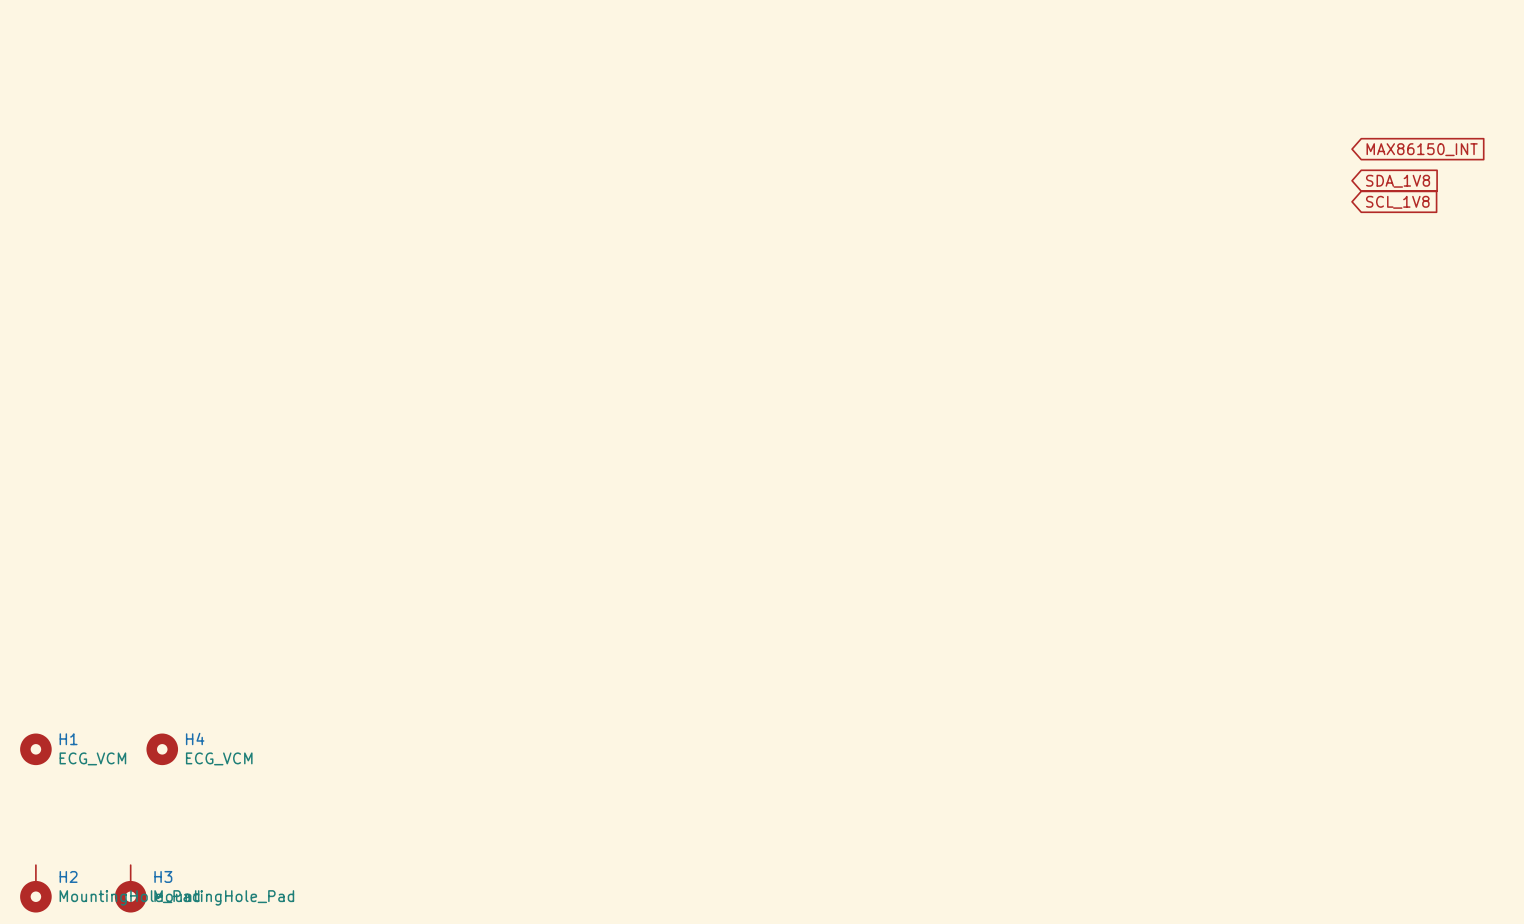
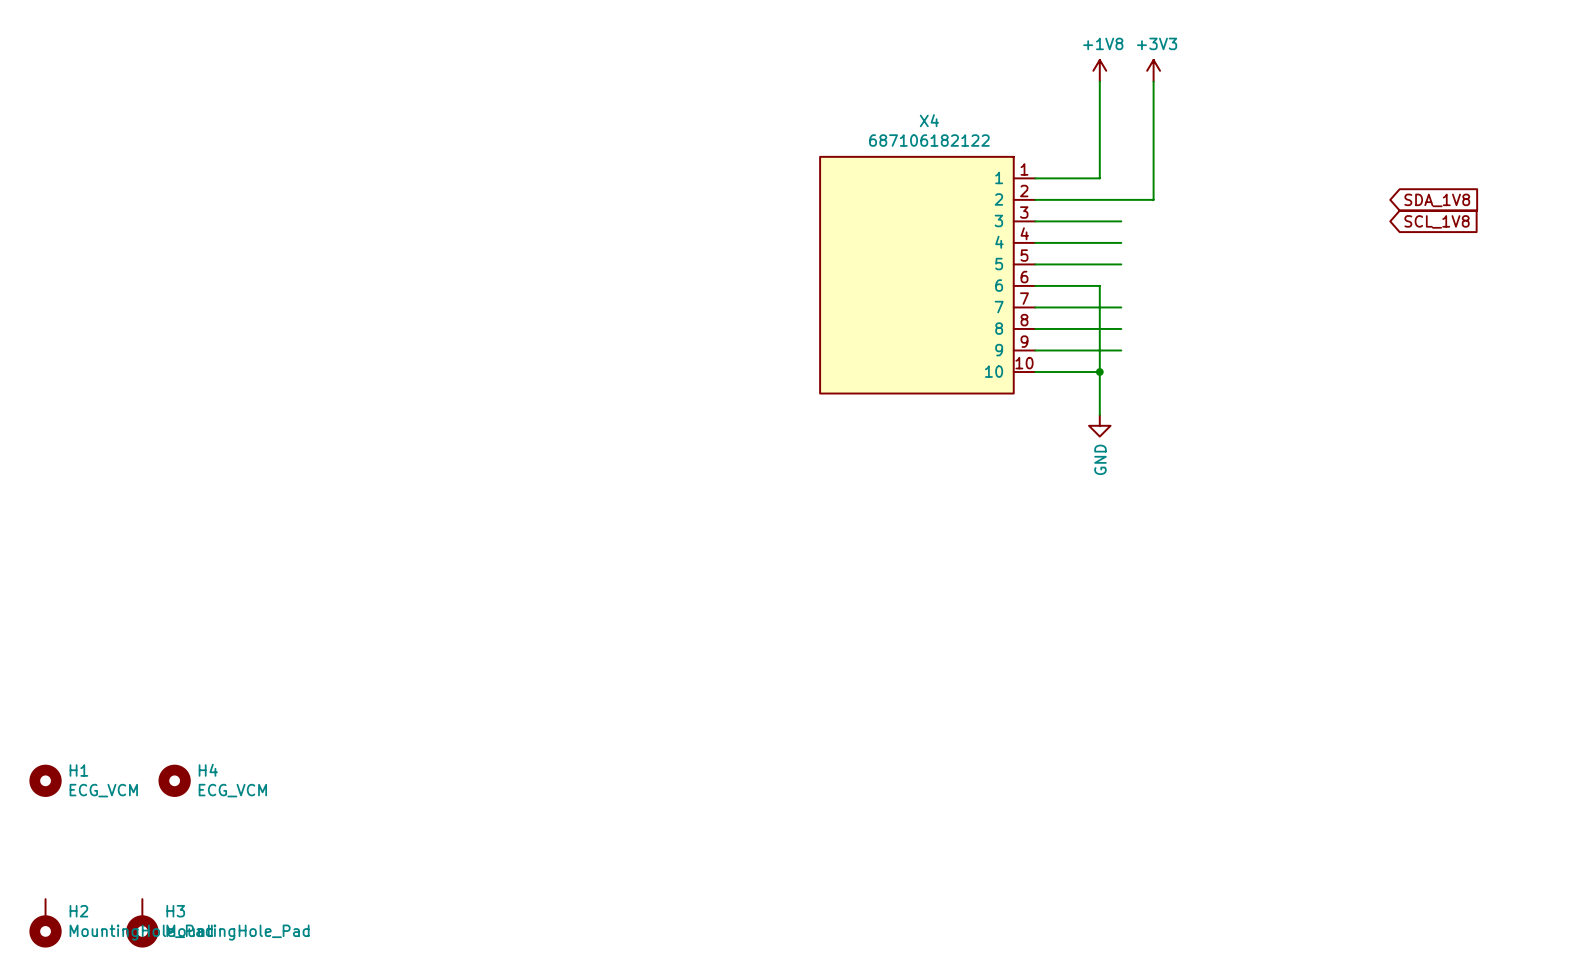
power symbol: none -> +1V8 (1099, 70)
power symbol: none -> +3V3 (1153, 70)
wire: none -> (1099, 81) (1099, 178) (1035, 178)
wire: none -> (1153, 81) (1153, 199) (1035, 199)
global label: MAX86150_INT (1422, 149) -> none
wire: none -> (1035, 221) (1121, 221)
wire: none -> (1035, 242) (1121, 242)
wire: none -> (1035, 264) (1121, 264)
X4: none -> 687106182122 (927, 275)
wire: none -> (1035, 285) (1099, 285) (1099, 415)
wire: none -> (1035, 307) (1121, 307)
wire: none -> (1035, 328) (1121, 328)
wire: none -> (1035, 350) (1121, 350)
wire: none -> (1035, 372) (1099, 372)
junction: none -> (1099, 372)
power symbol: none -> GND (1099, 425)

